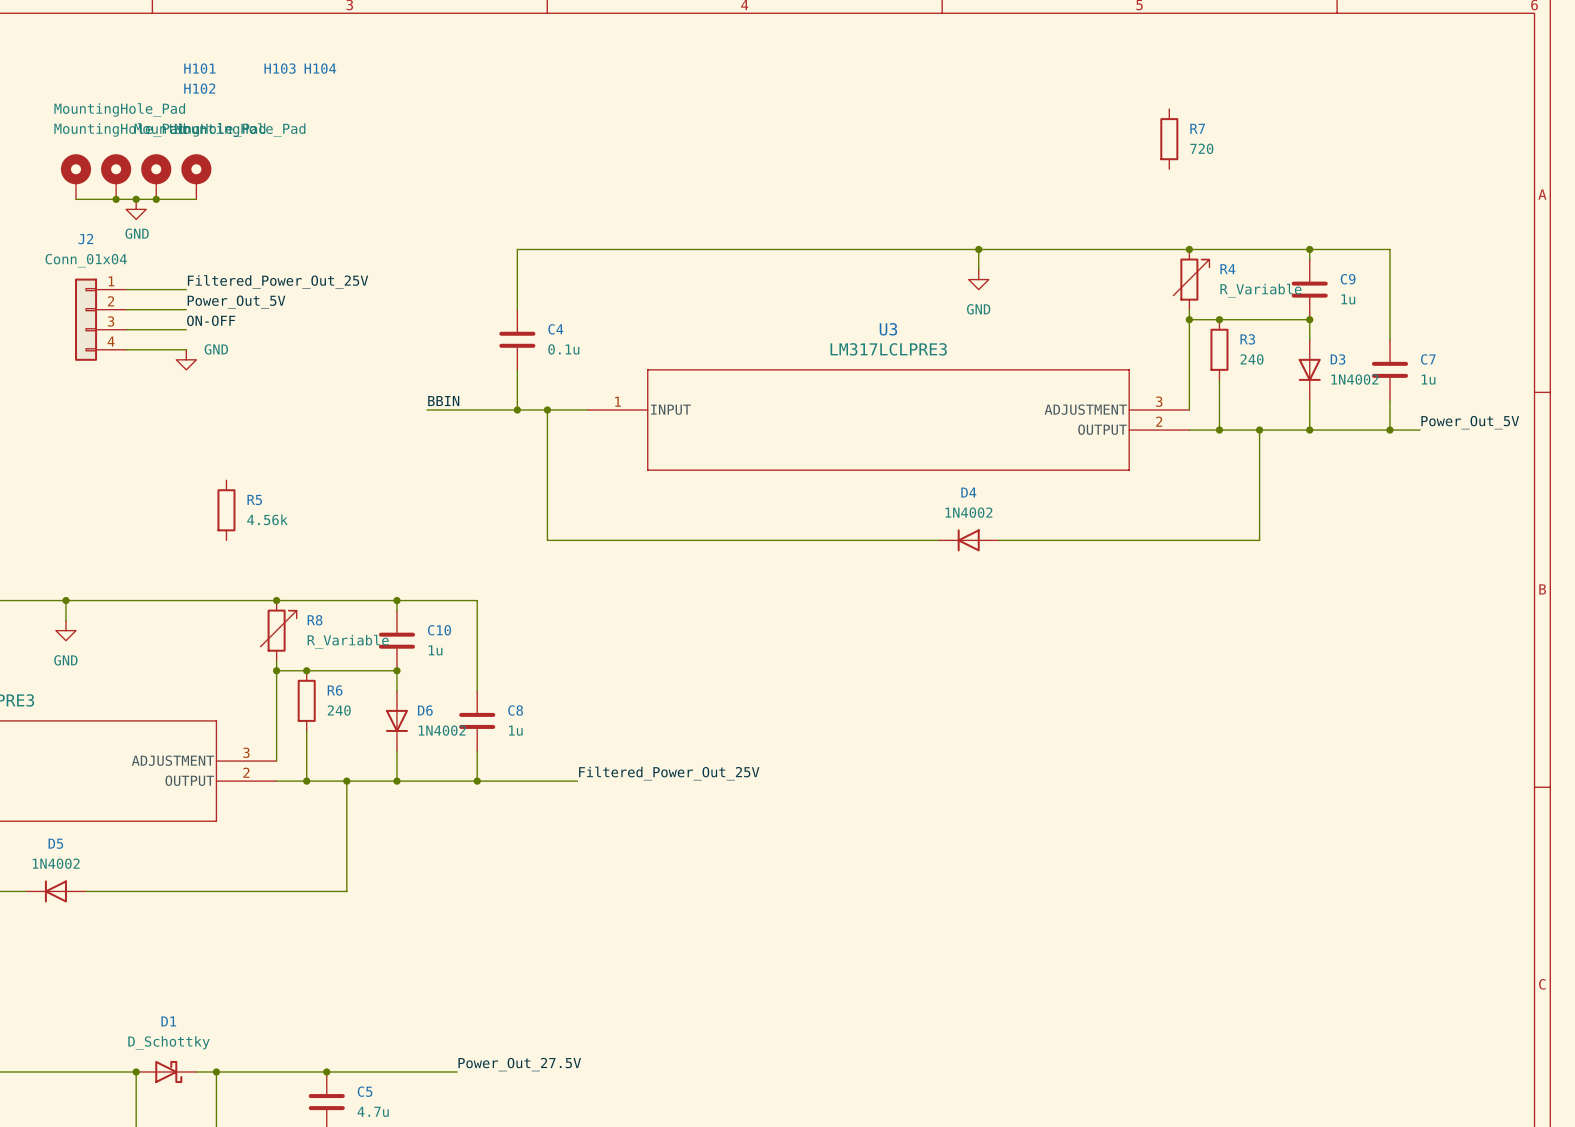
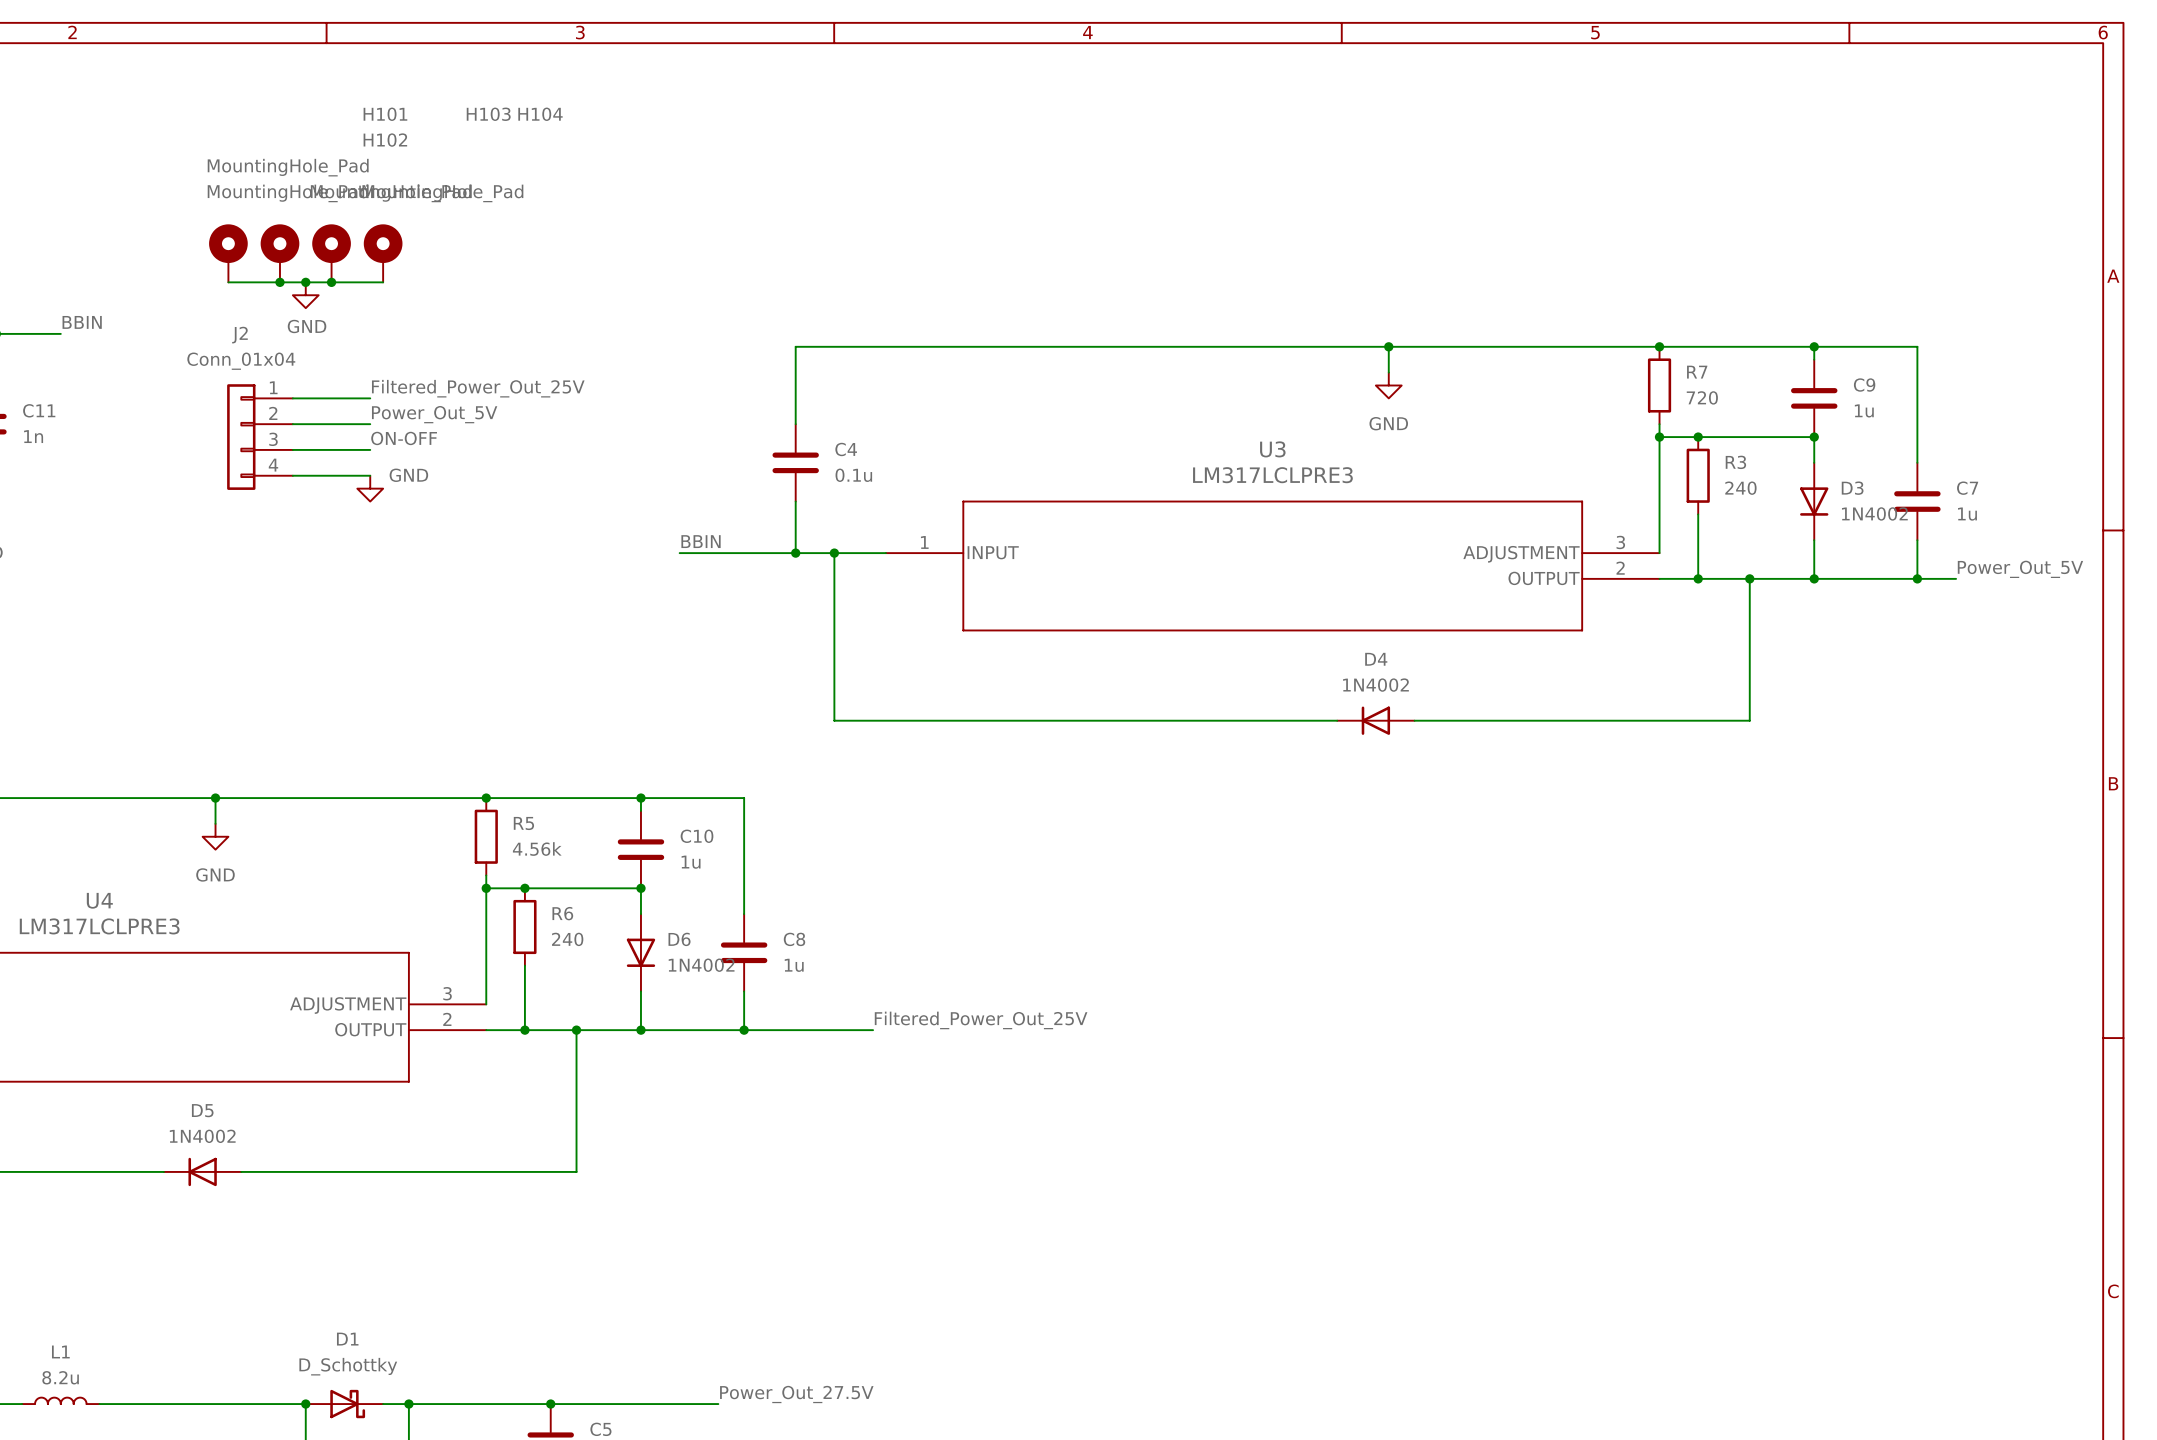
R7 position: (1169, 139) -> (1659, 385)
R4: R_Variable (1191, 279) -> none
R5 position: (226, 510) -> (486, 836)
R8: R_Variable (278, 630) -> none

